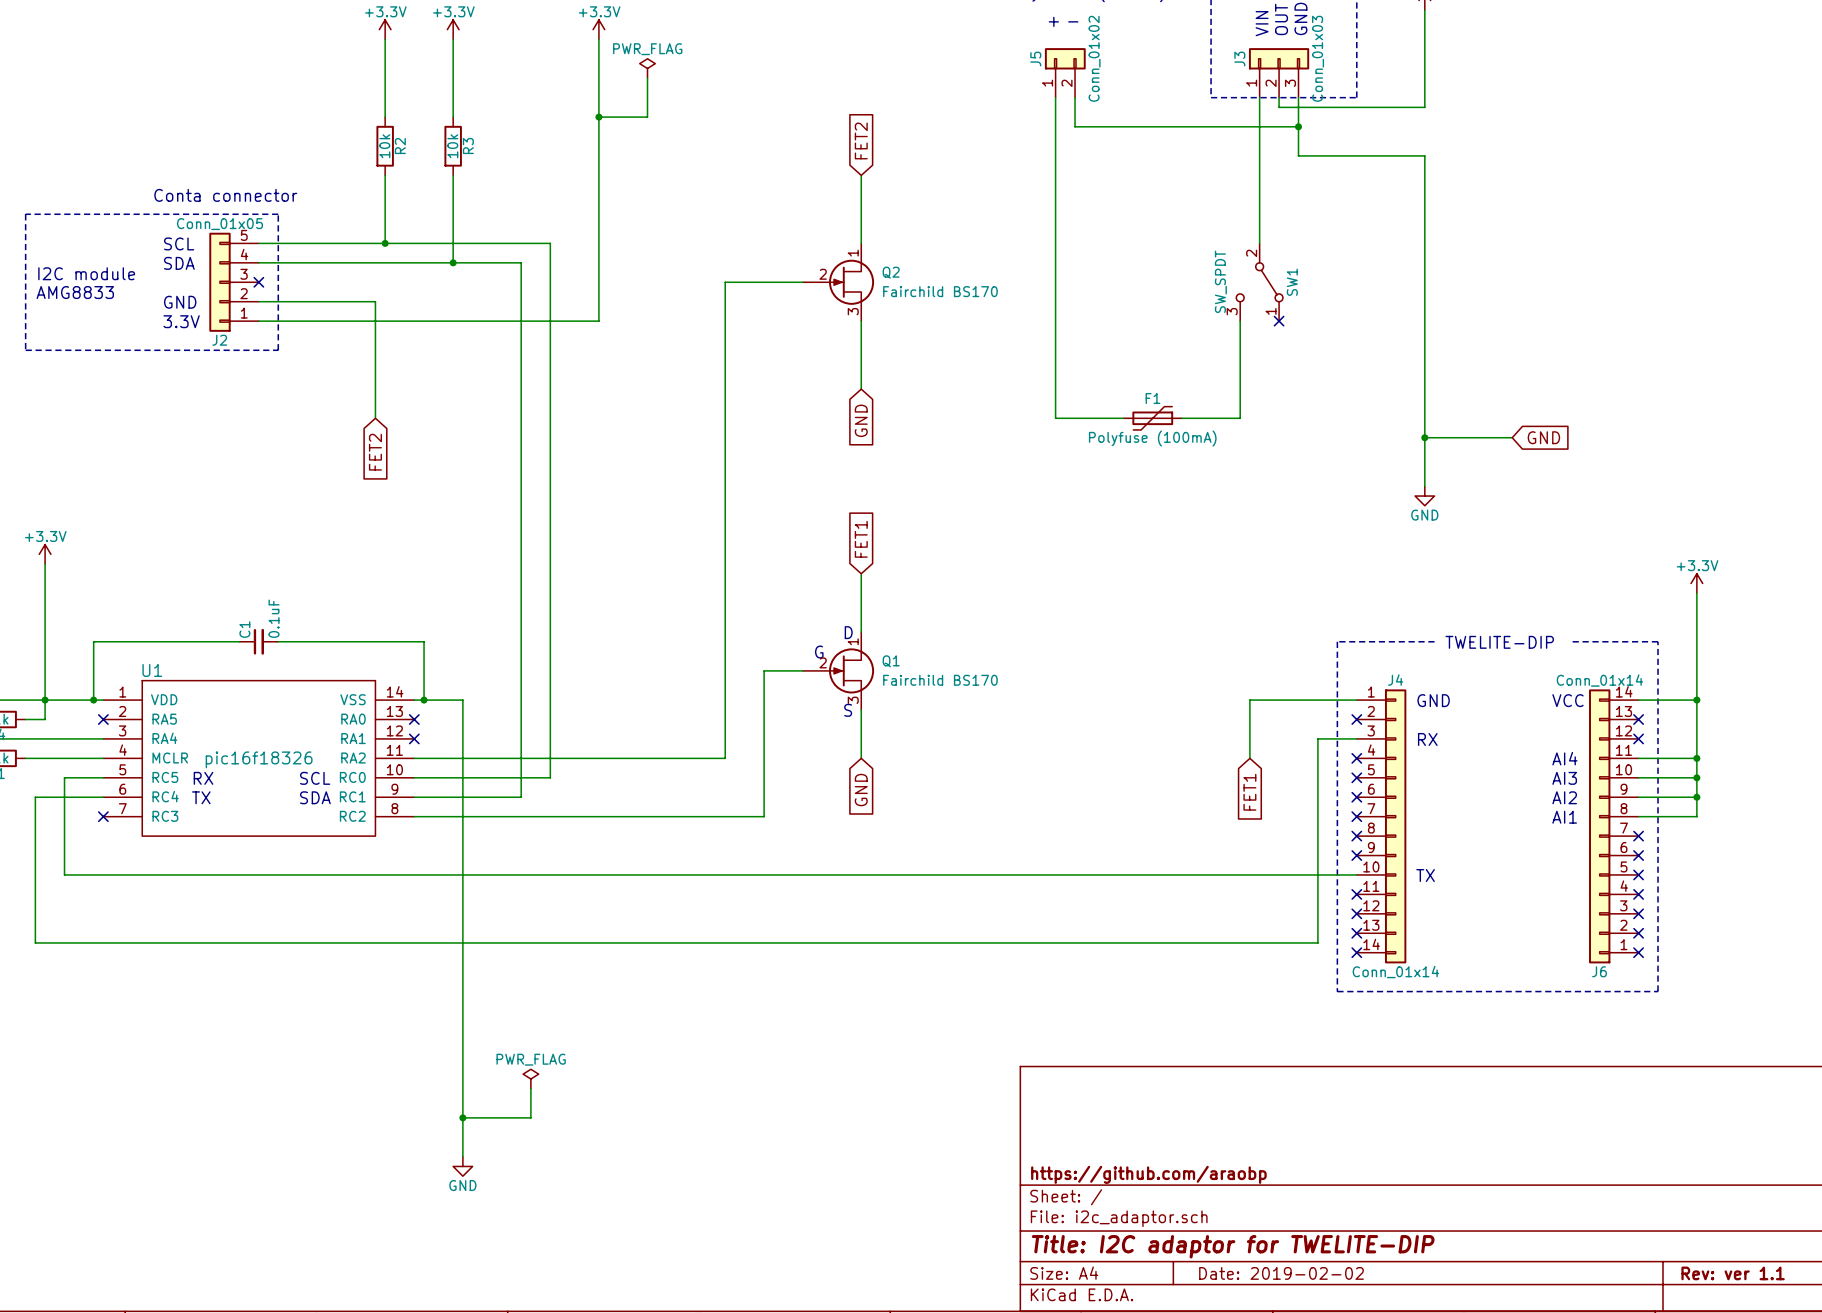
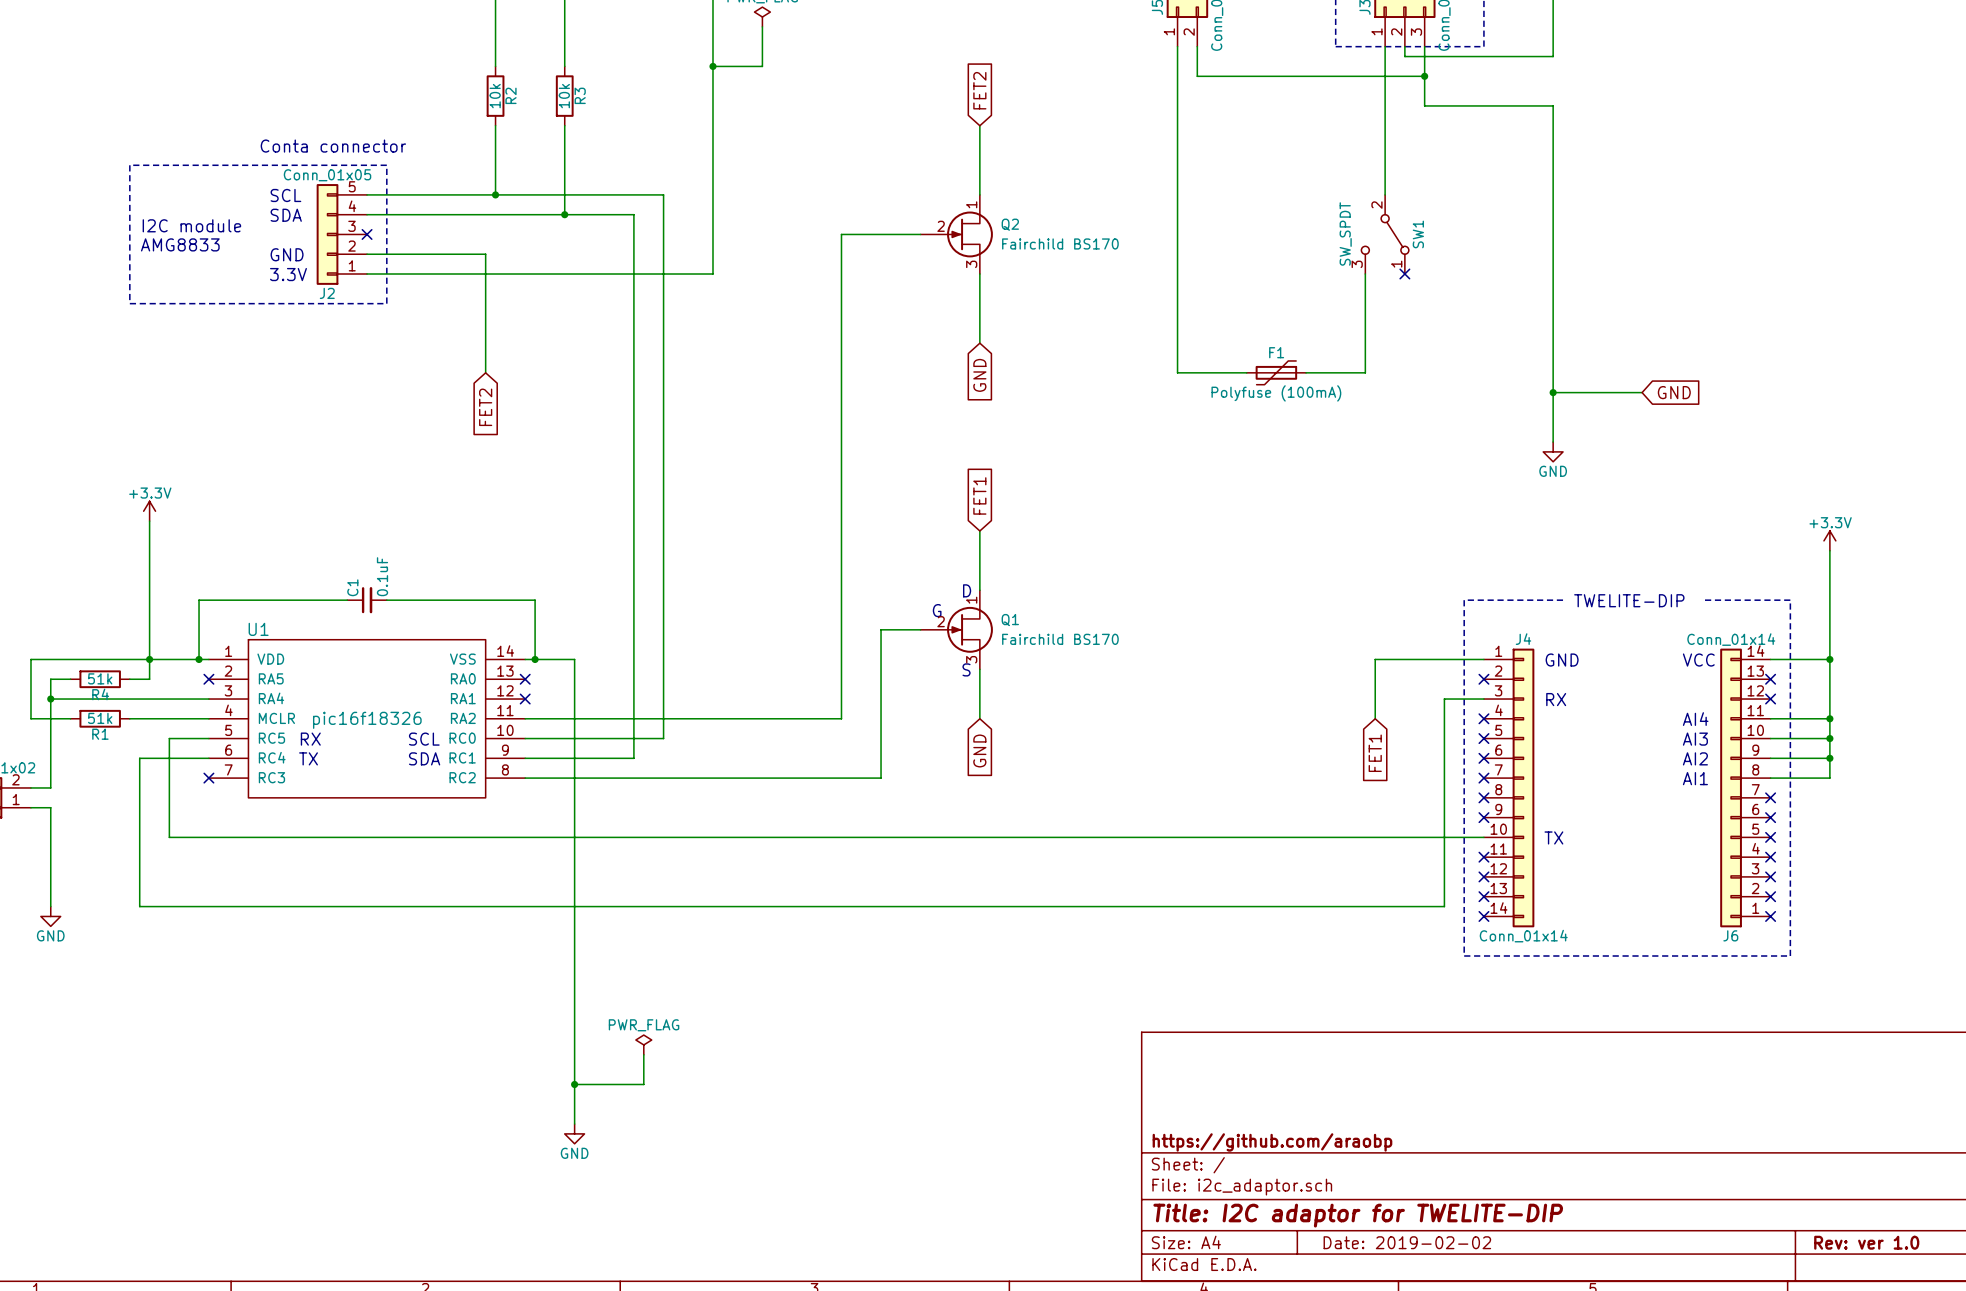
title block: Rev: ver 1.1 (1733, 1273) -> Rev: ver 1.0 (1866, 1242)

